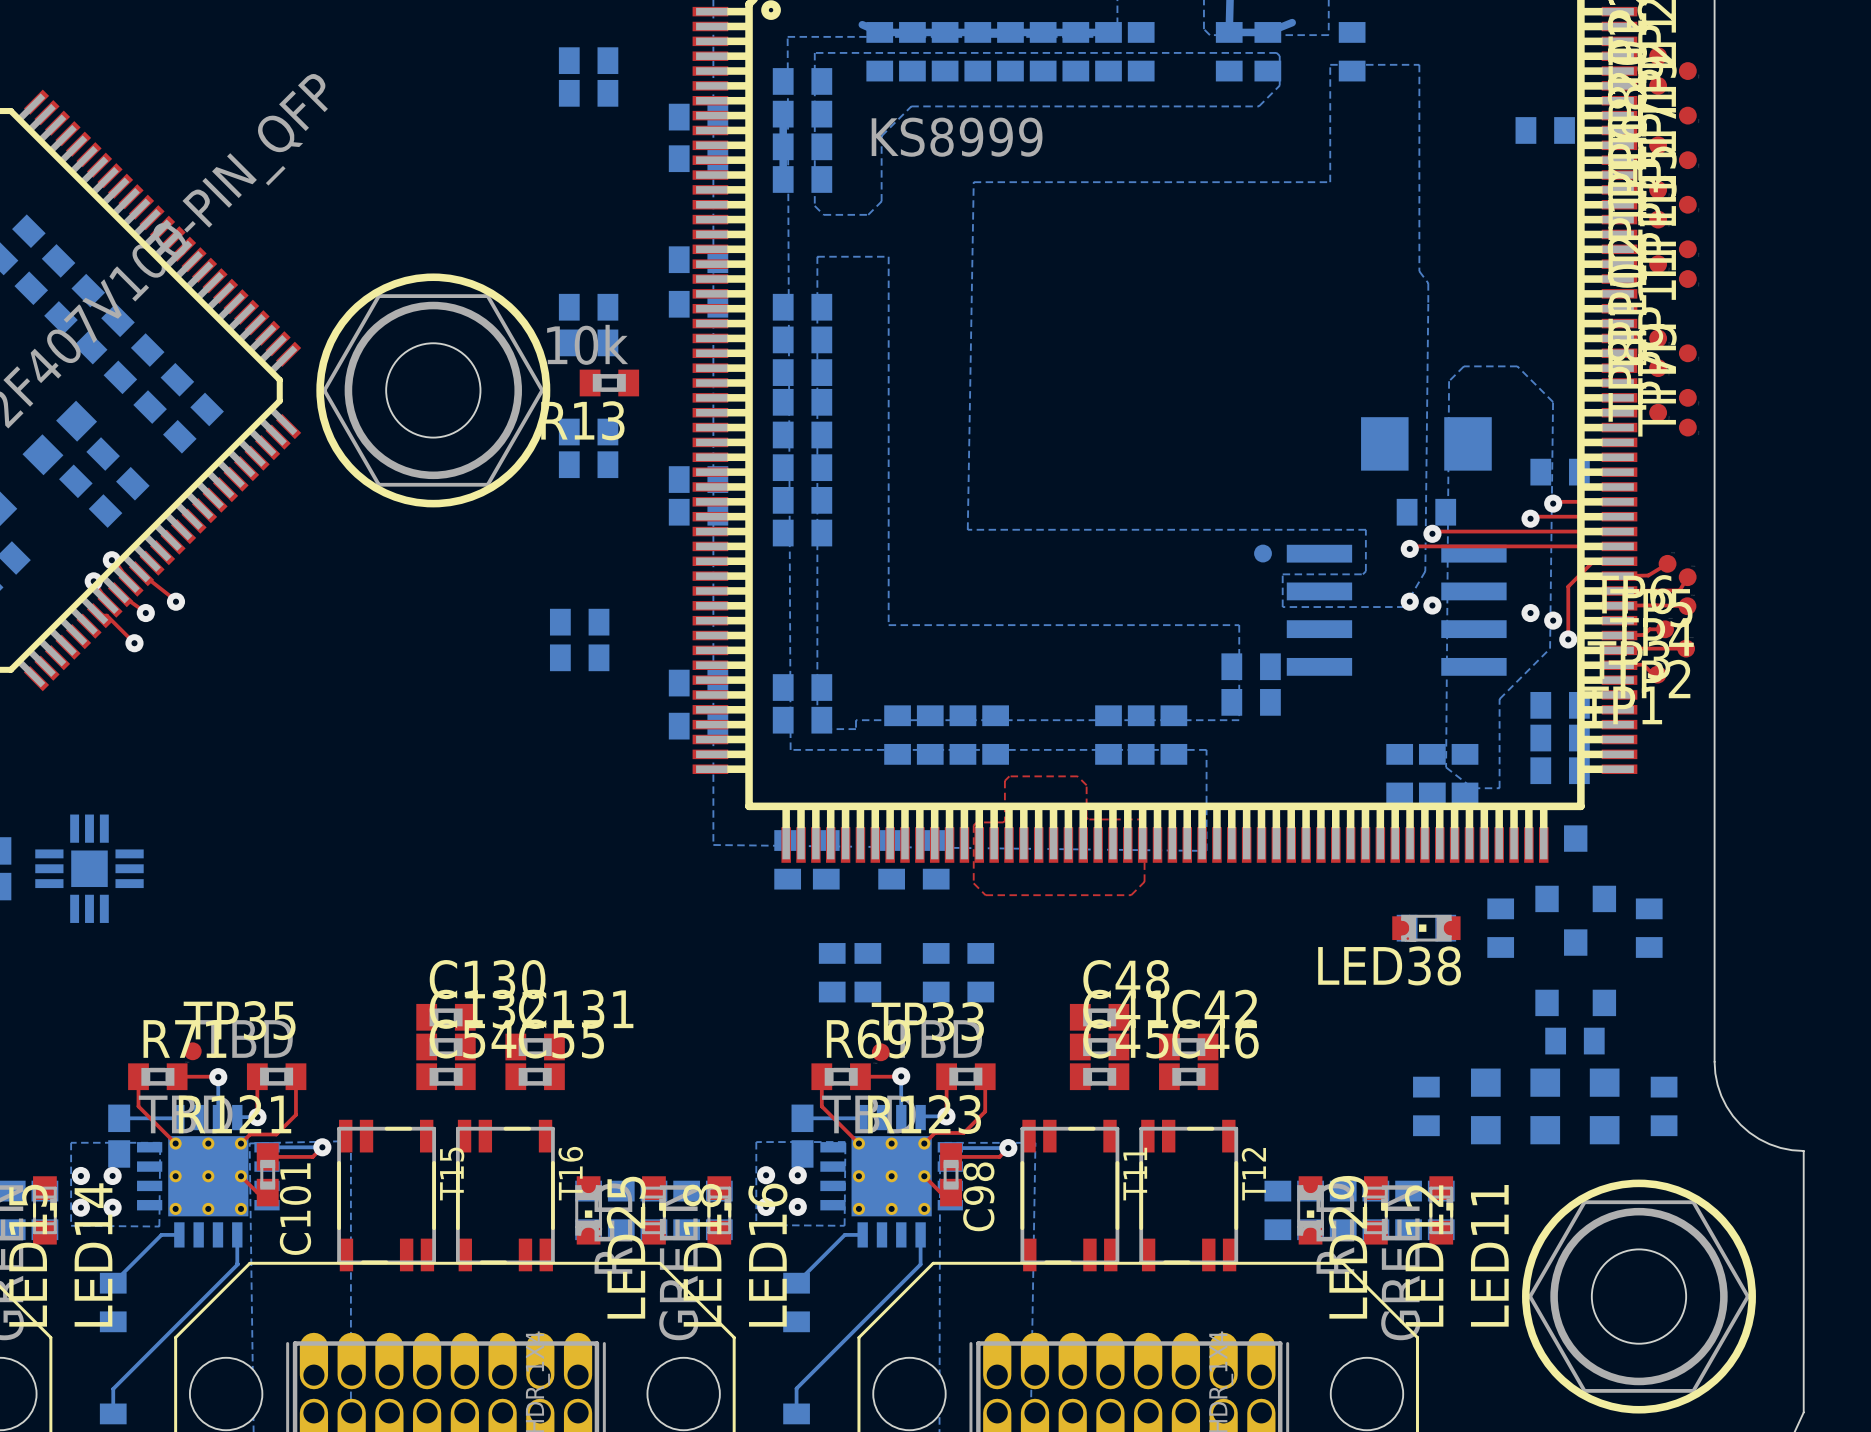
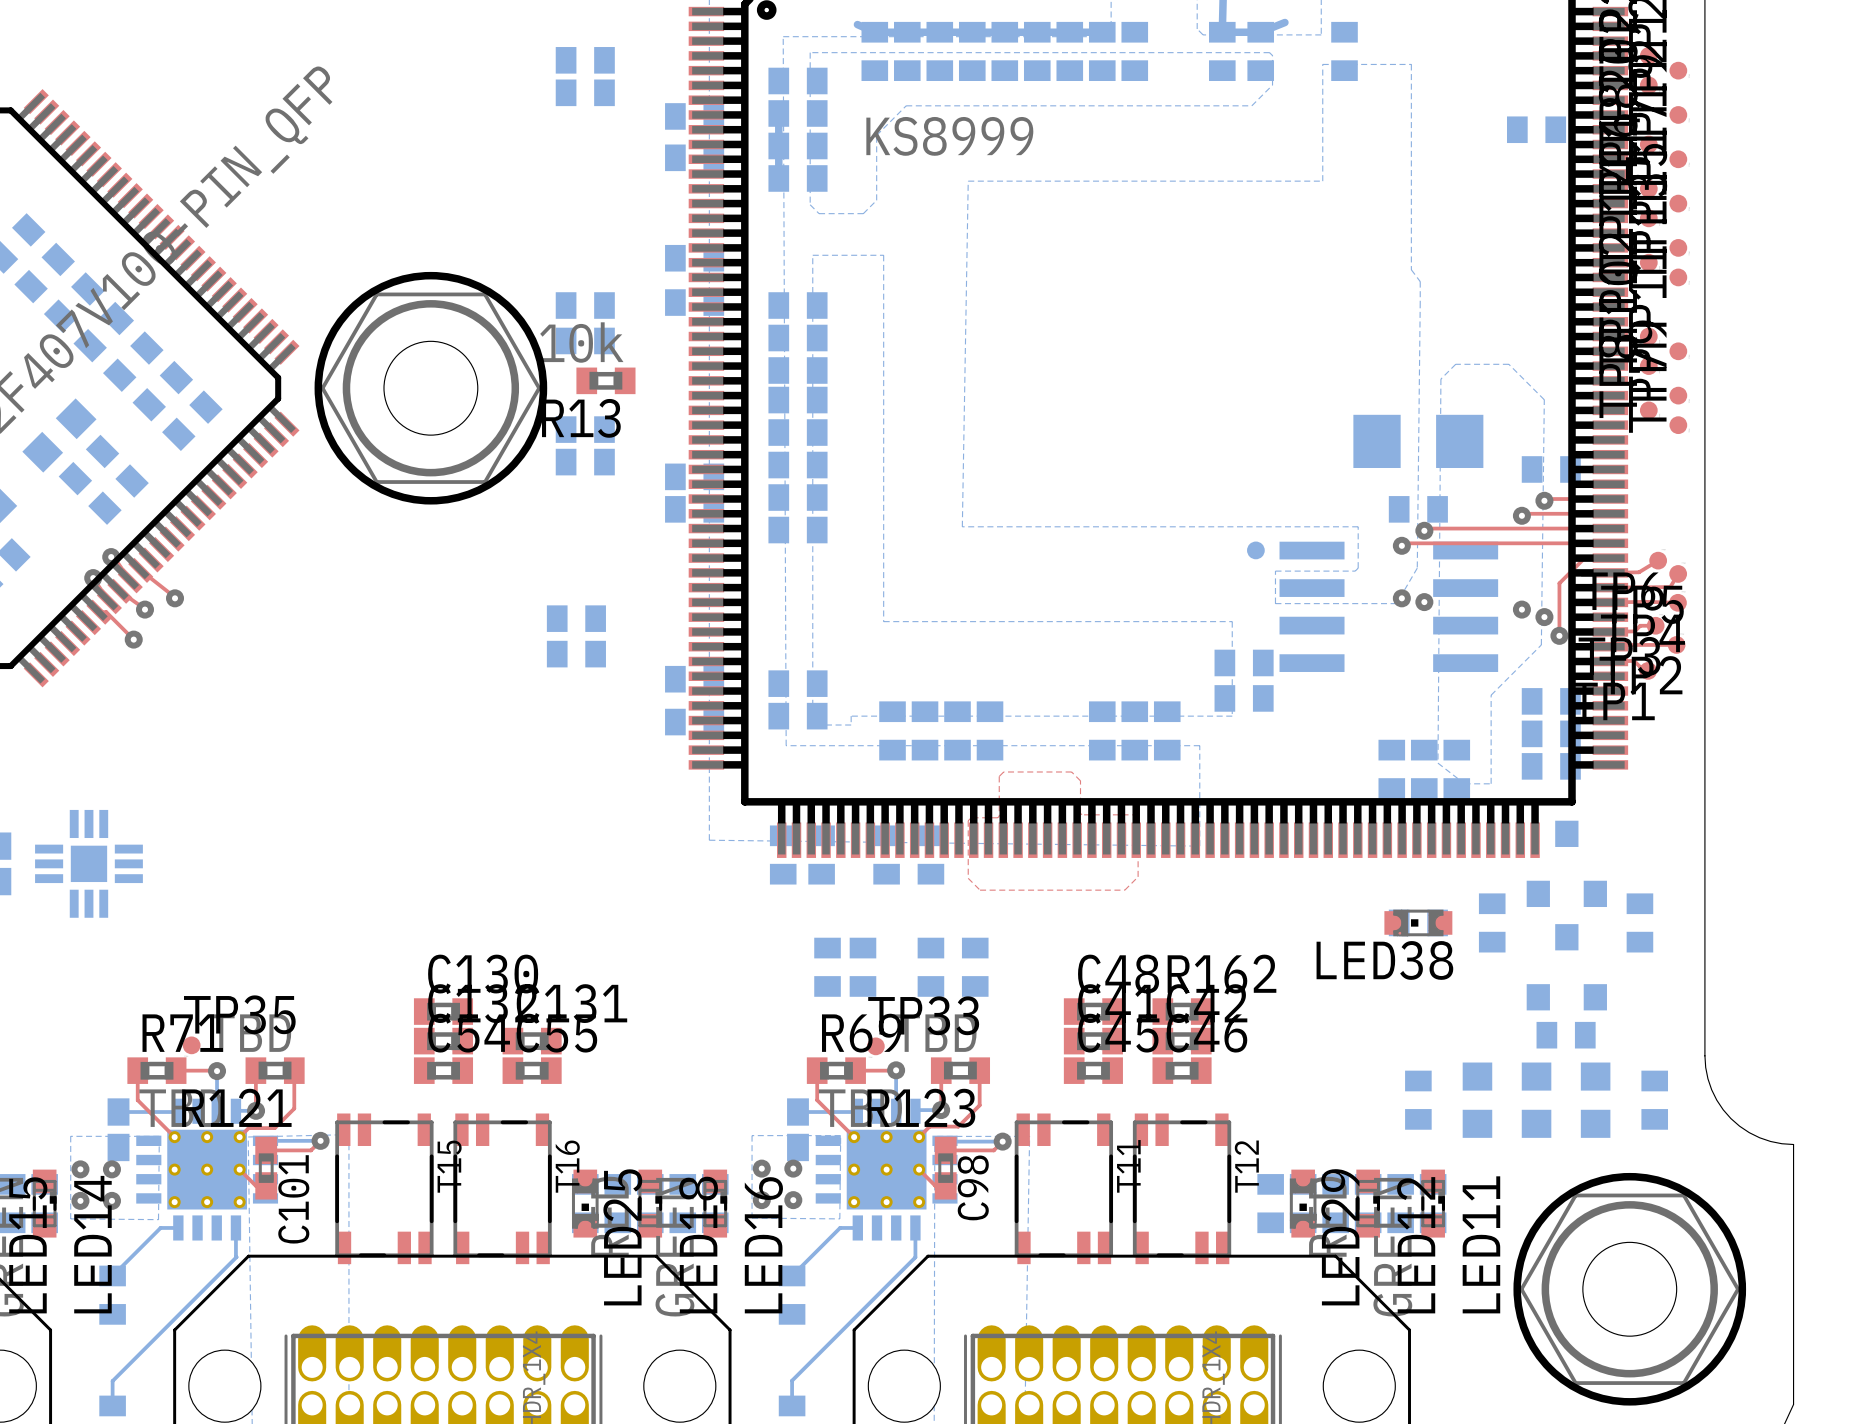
R162: none -> (1182, 1011)

